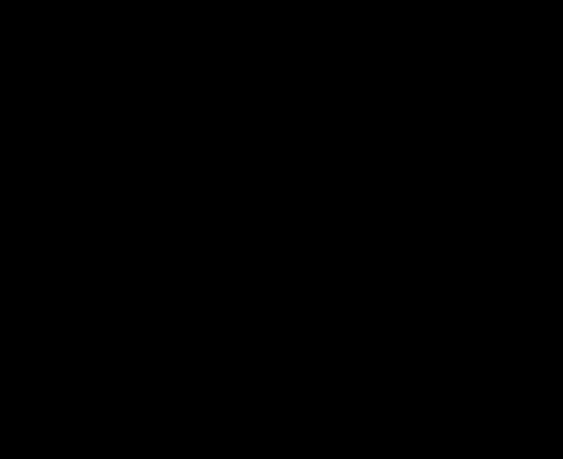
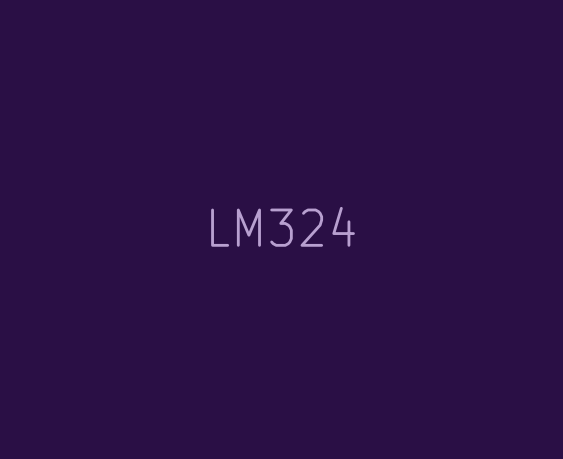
text: none -> LM324 (283, 226)

